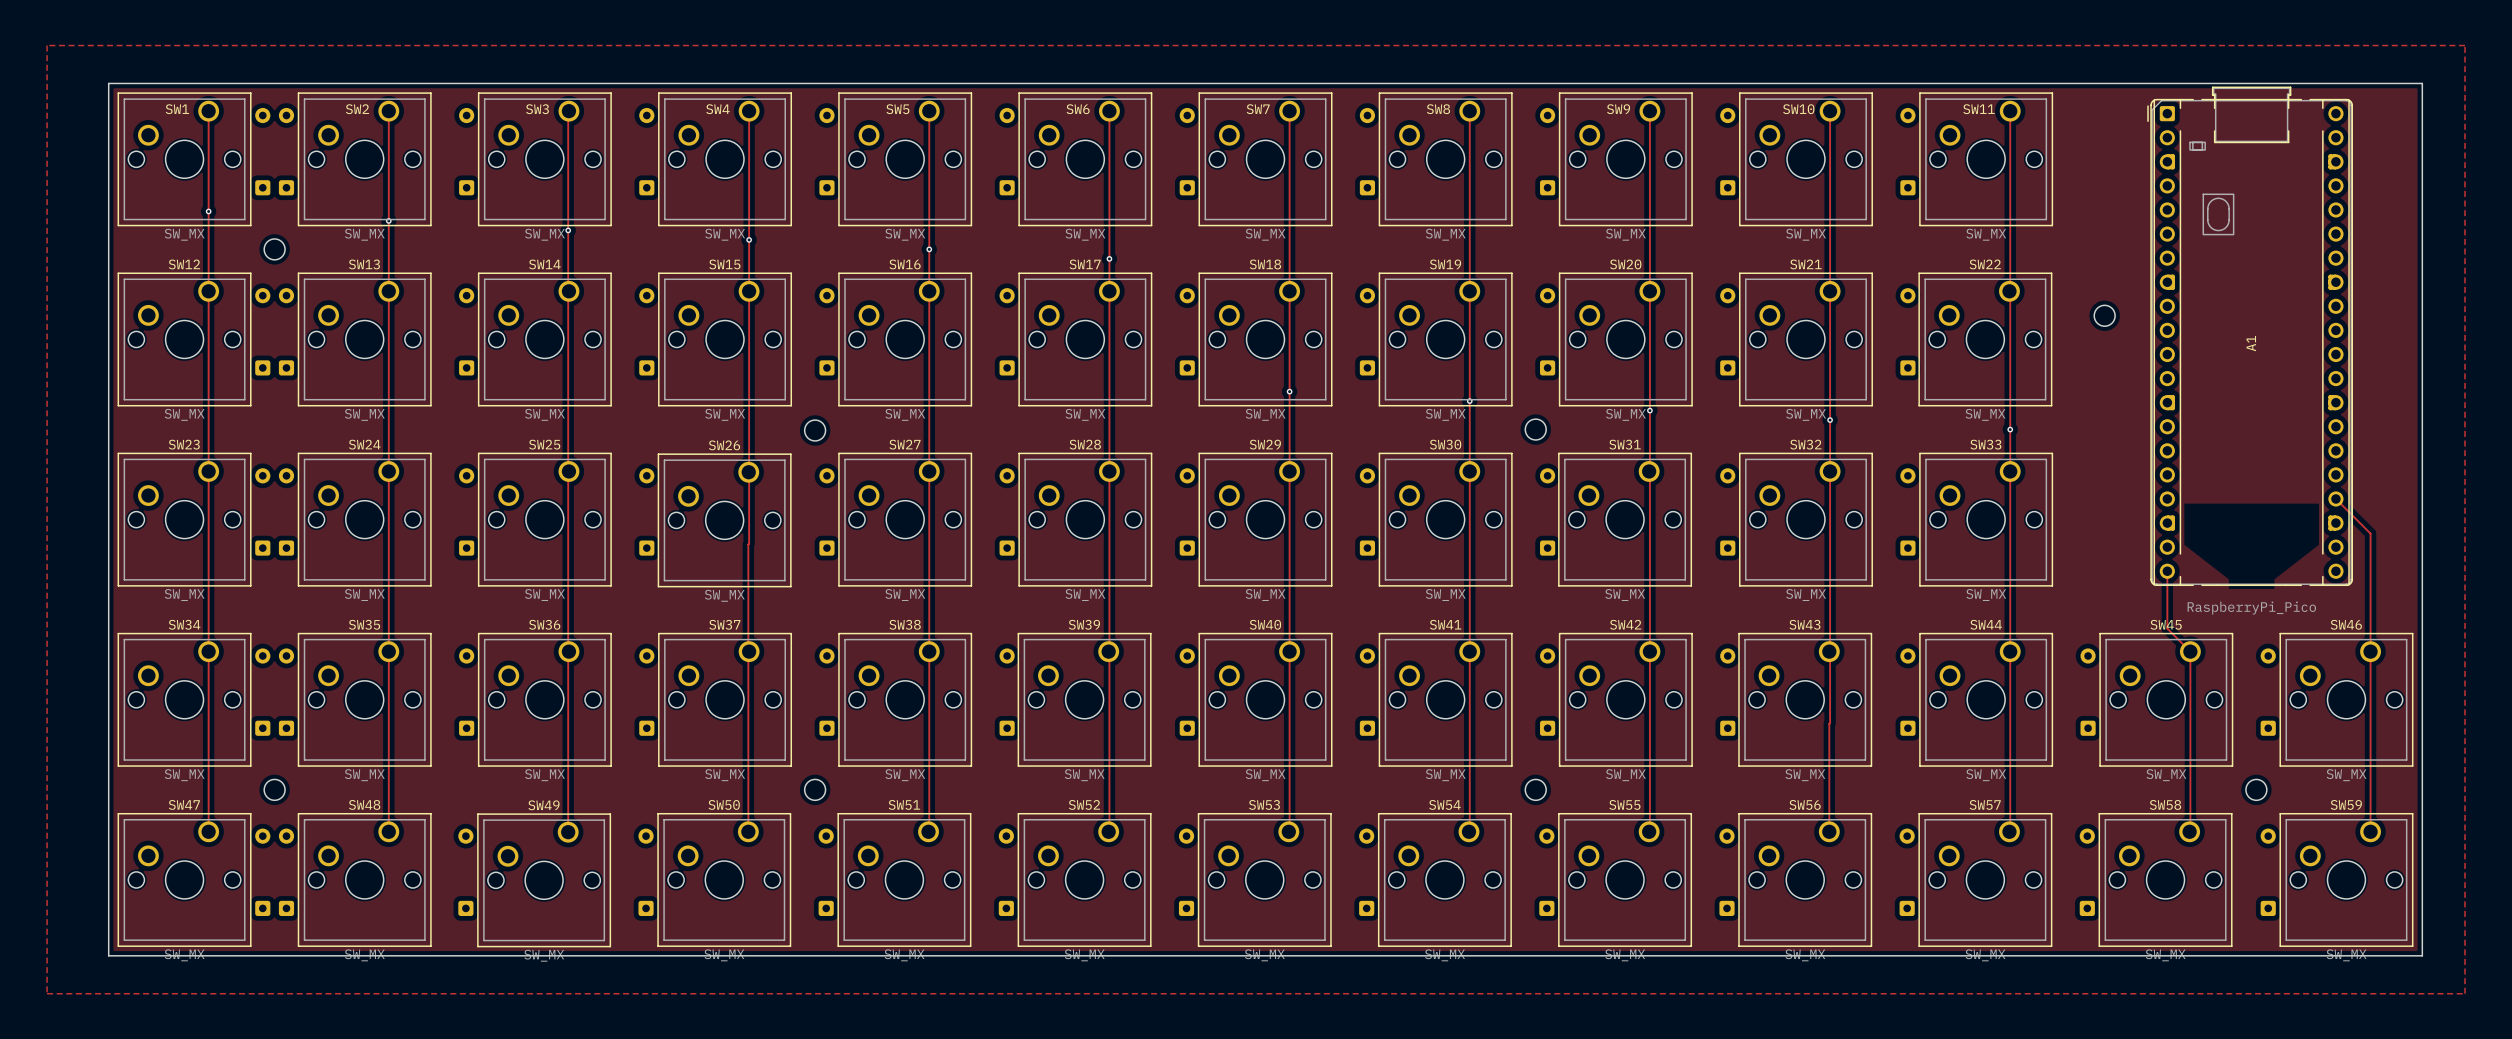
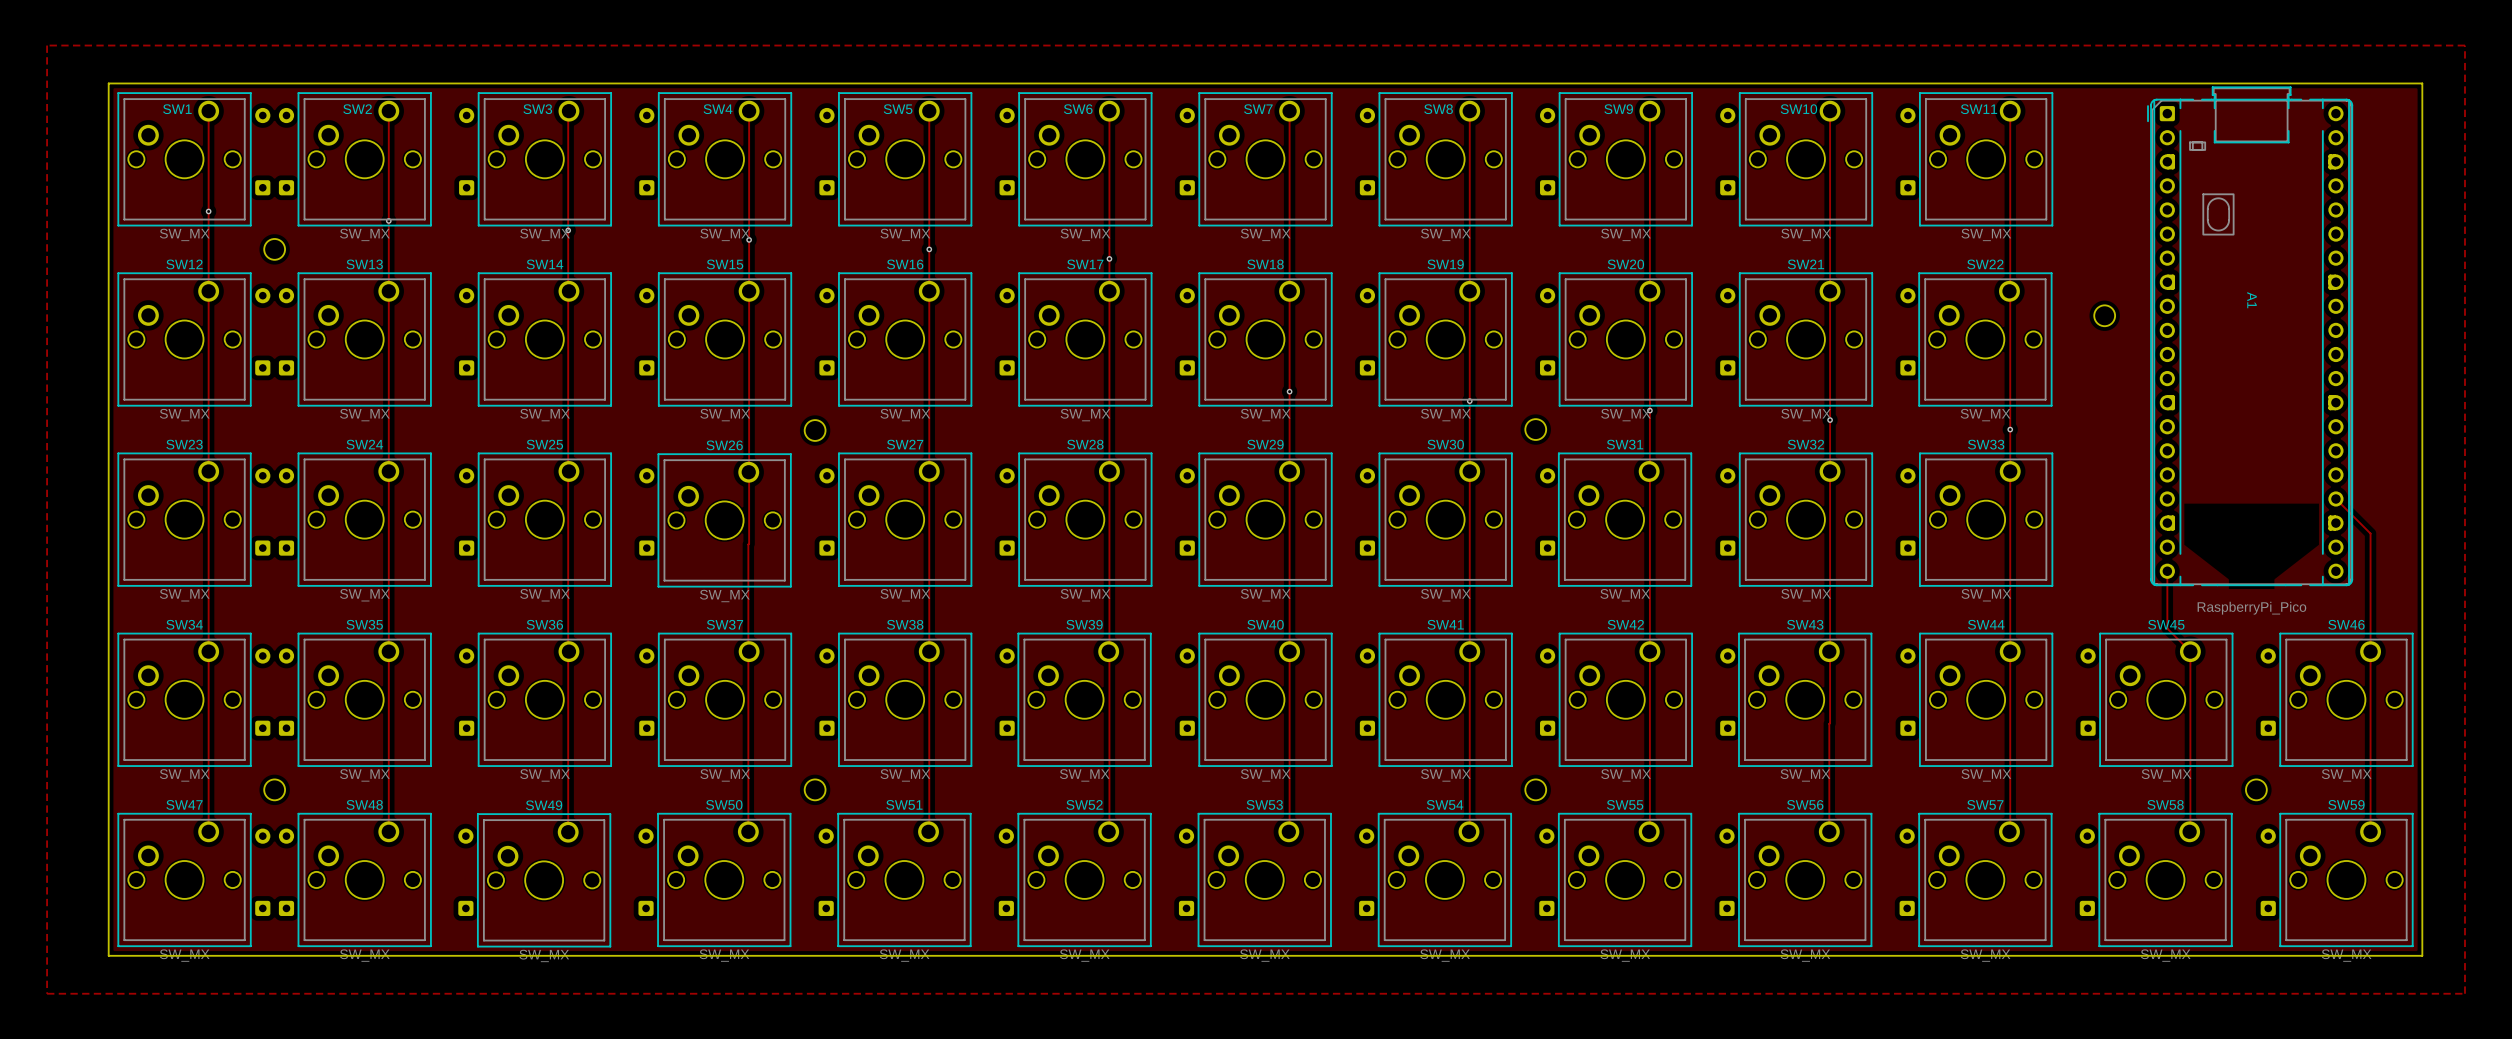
A1 name rotation: 0° (2251, 343) -> 180° (2252, 300)
A1 name position: A1 (2251, 343) -> A1 (2252, 300)

